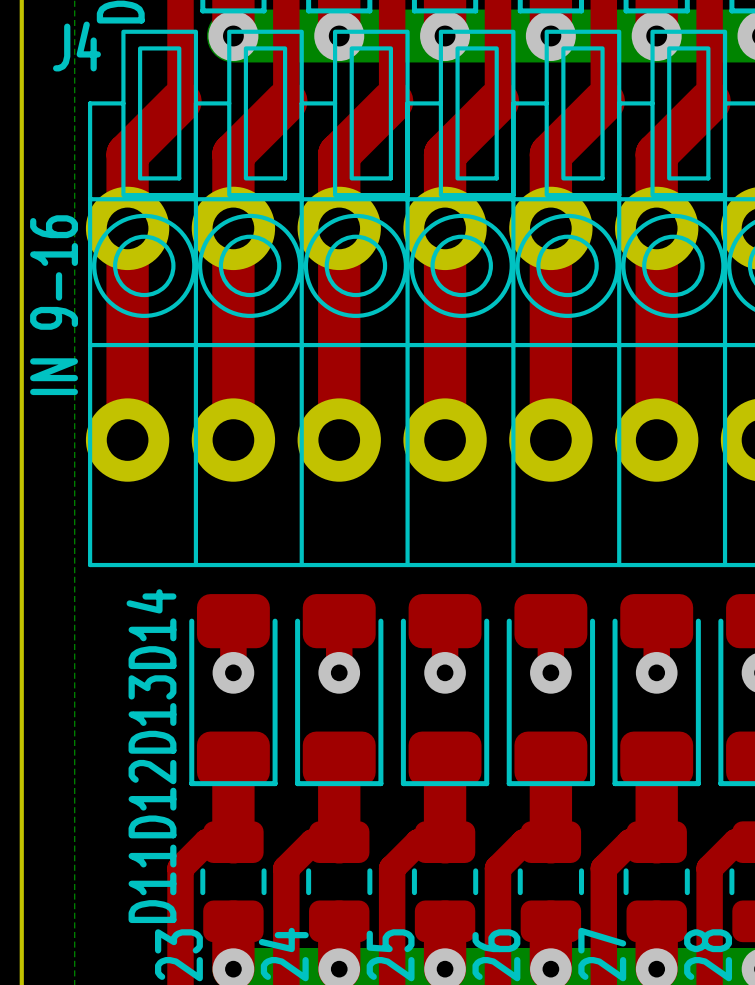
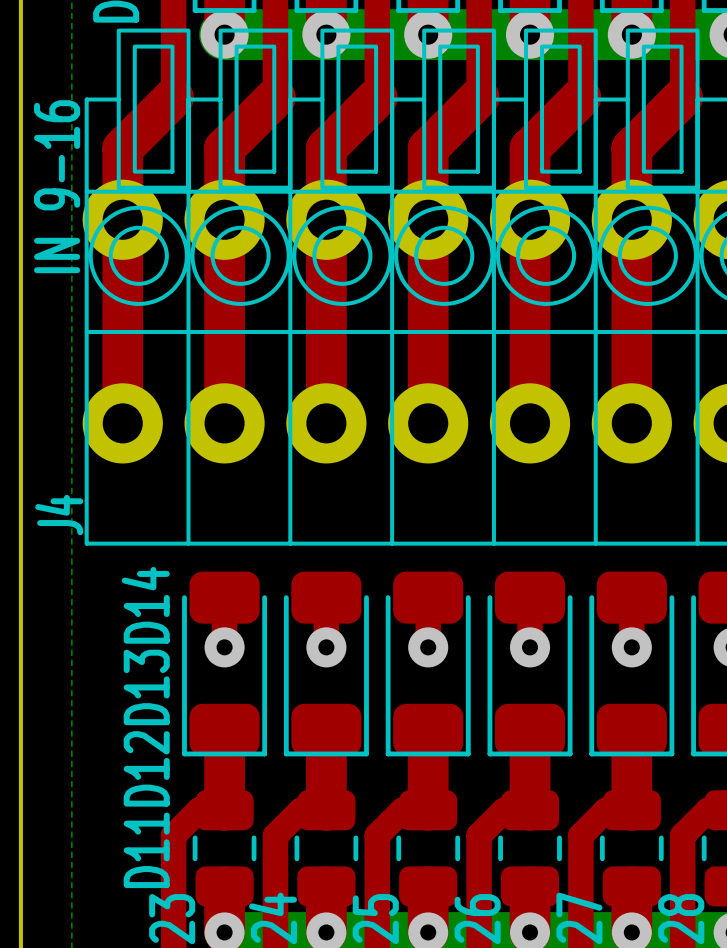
J4 name rotation: 0° (76, 46) -> 90° counterclockwise (59, 515)
J4 name position: J4 (76, 46) -> J4 (59, 515)
text position: IN 9-16 (54, 305) -> IN 9-16 (57, 186)

